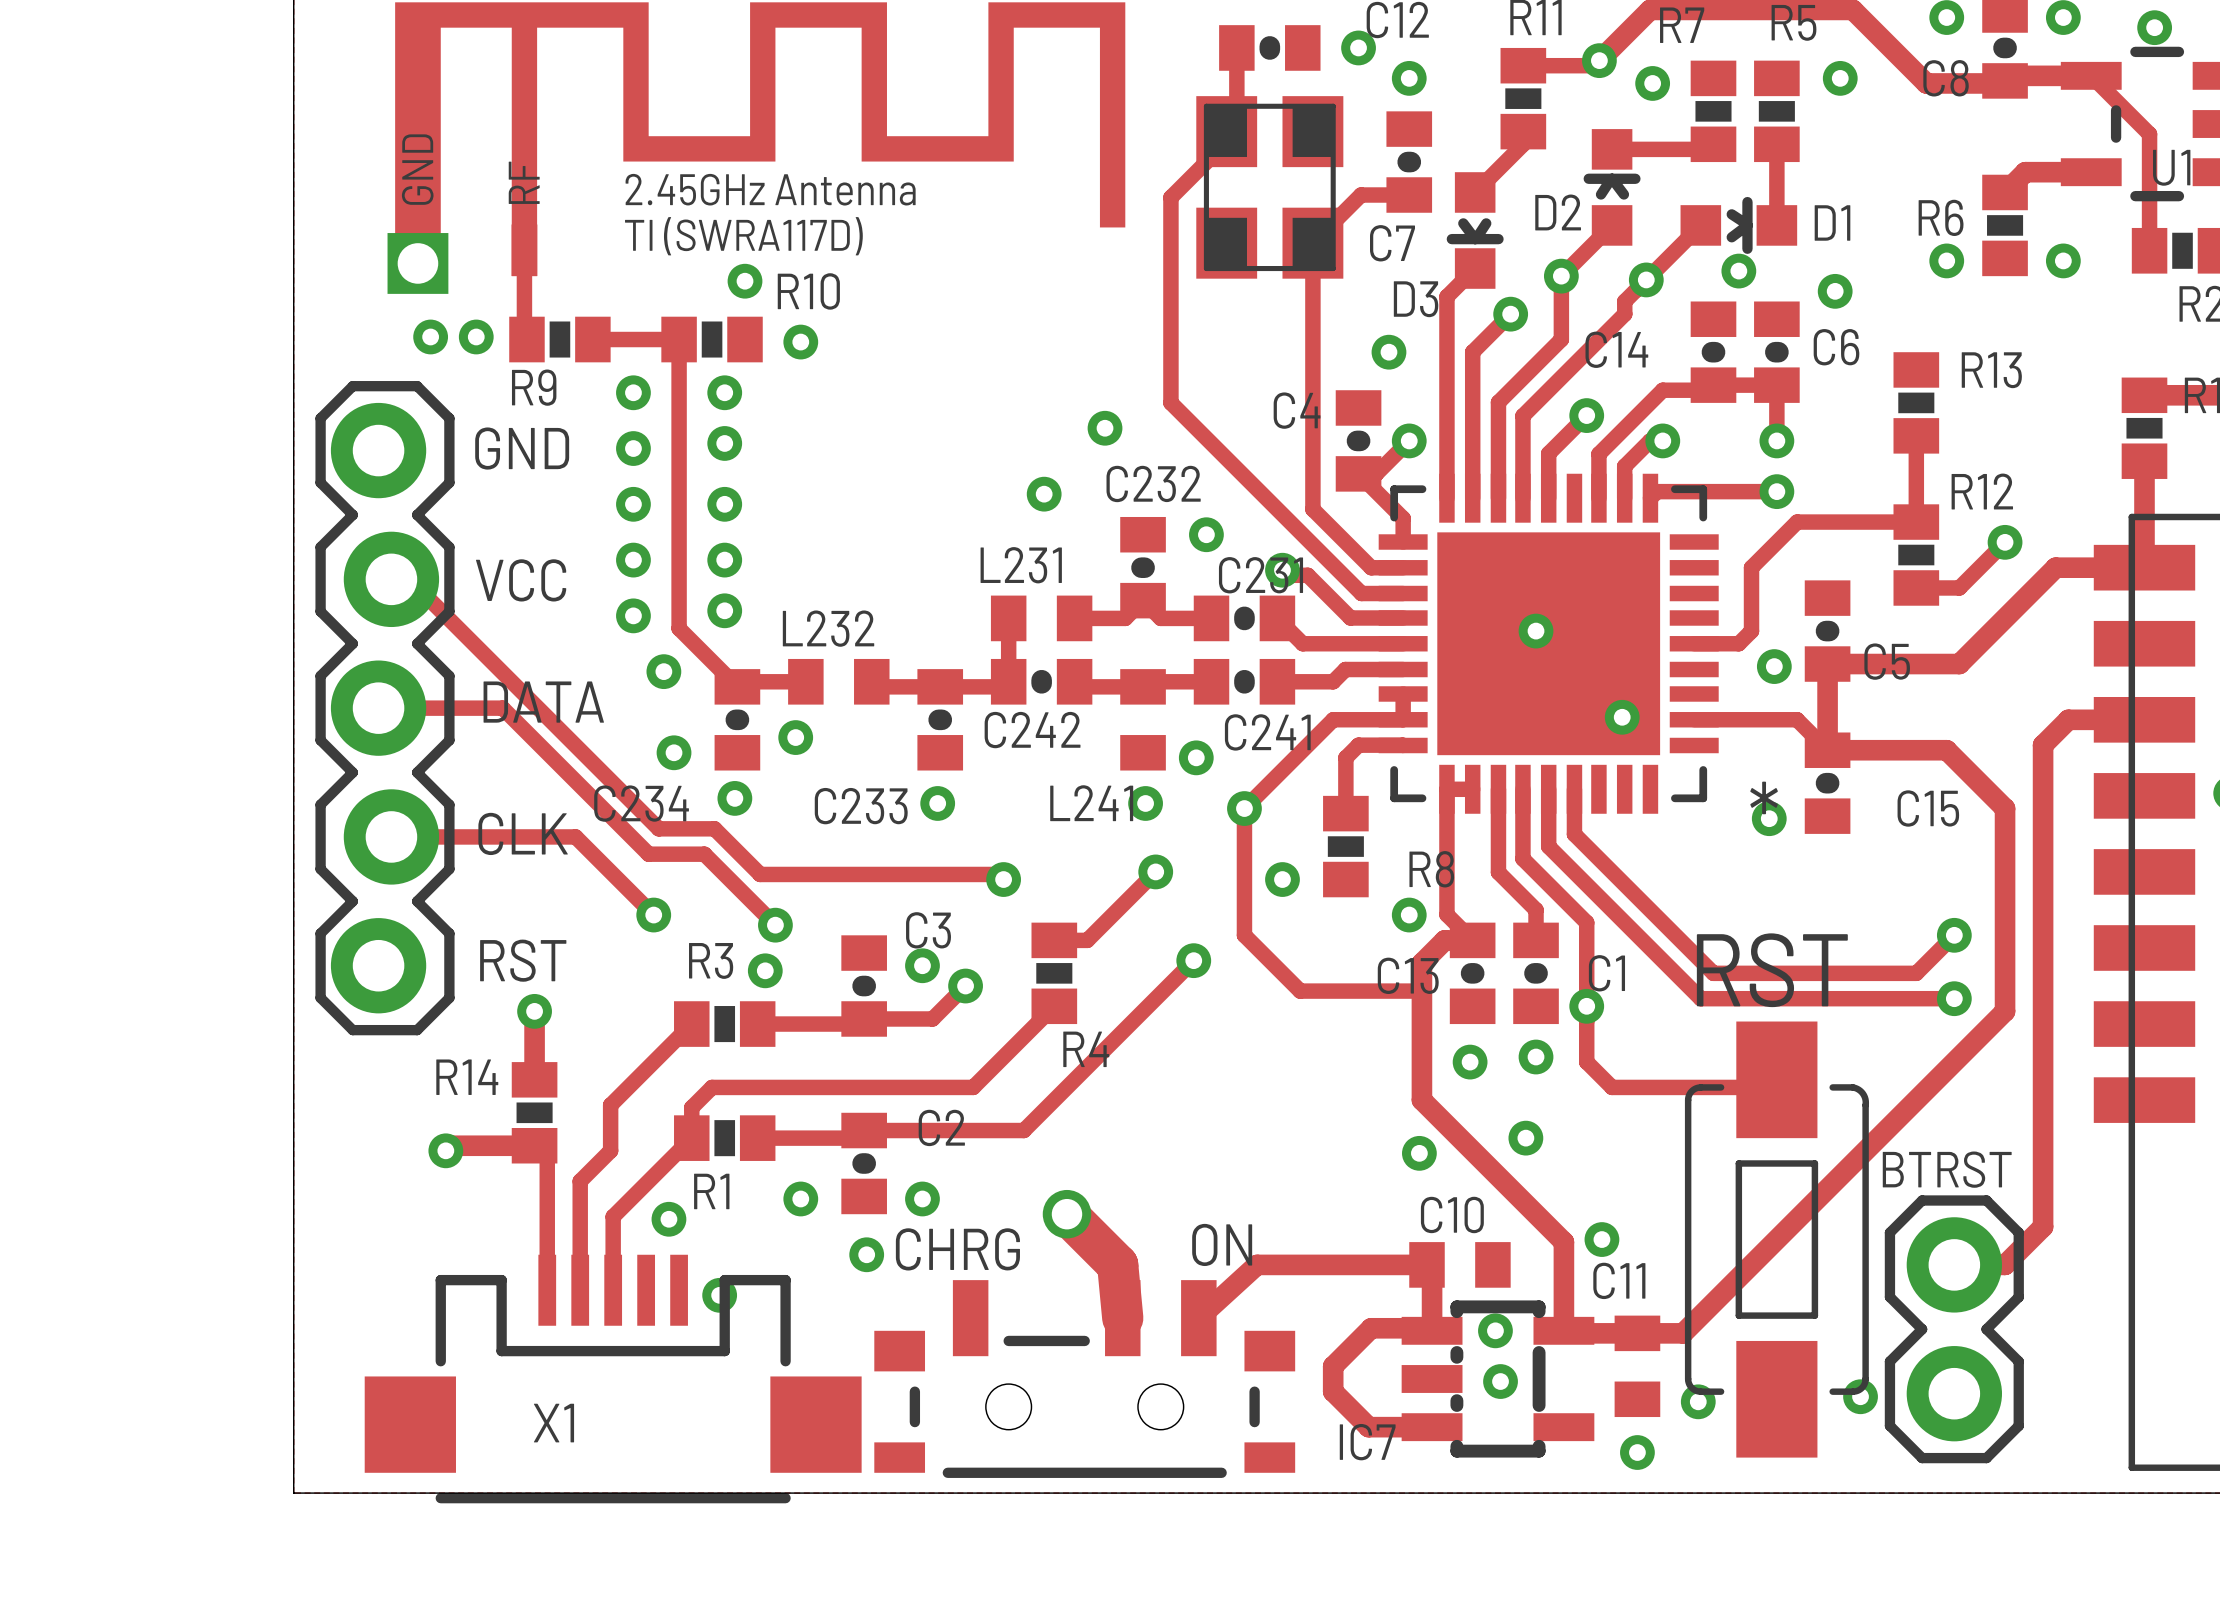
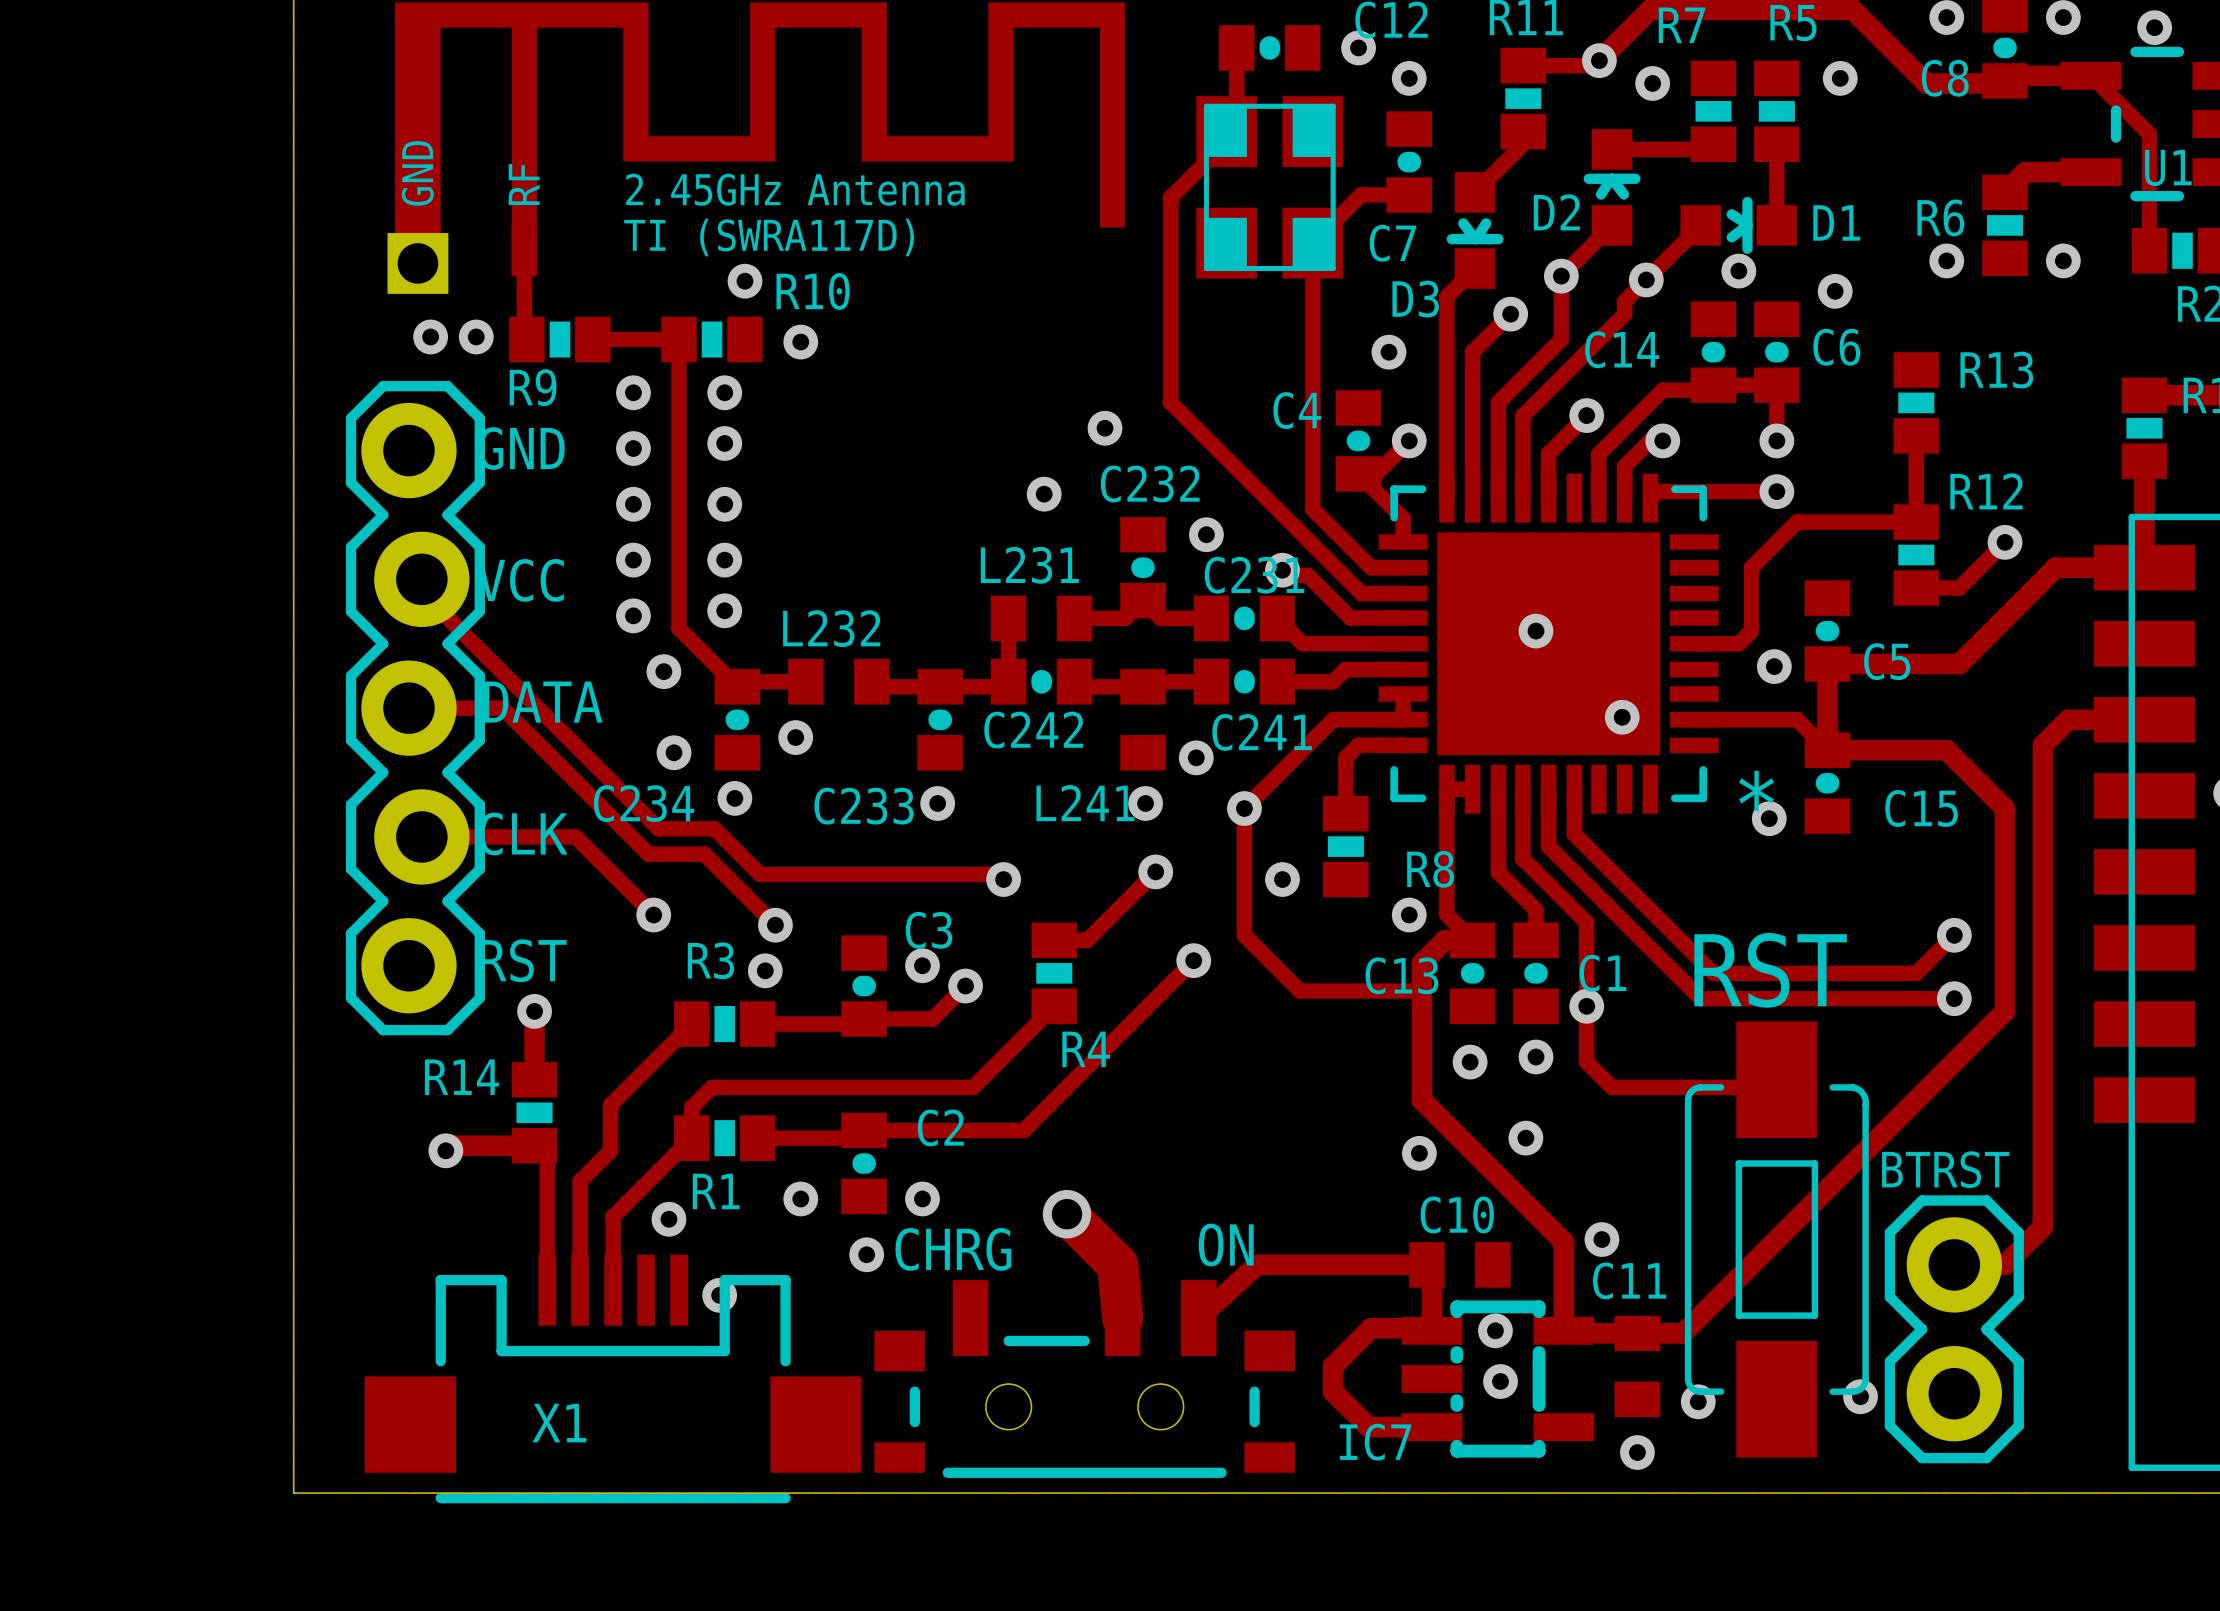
part position: (384, 708) -> (415, 708)

